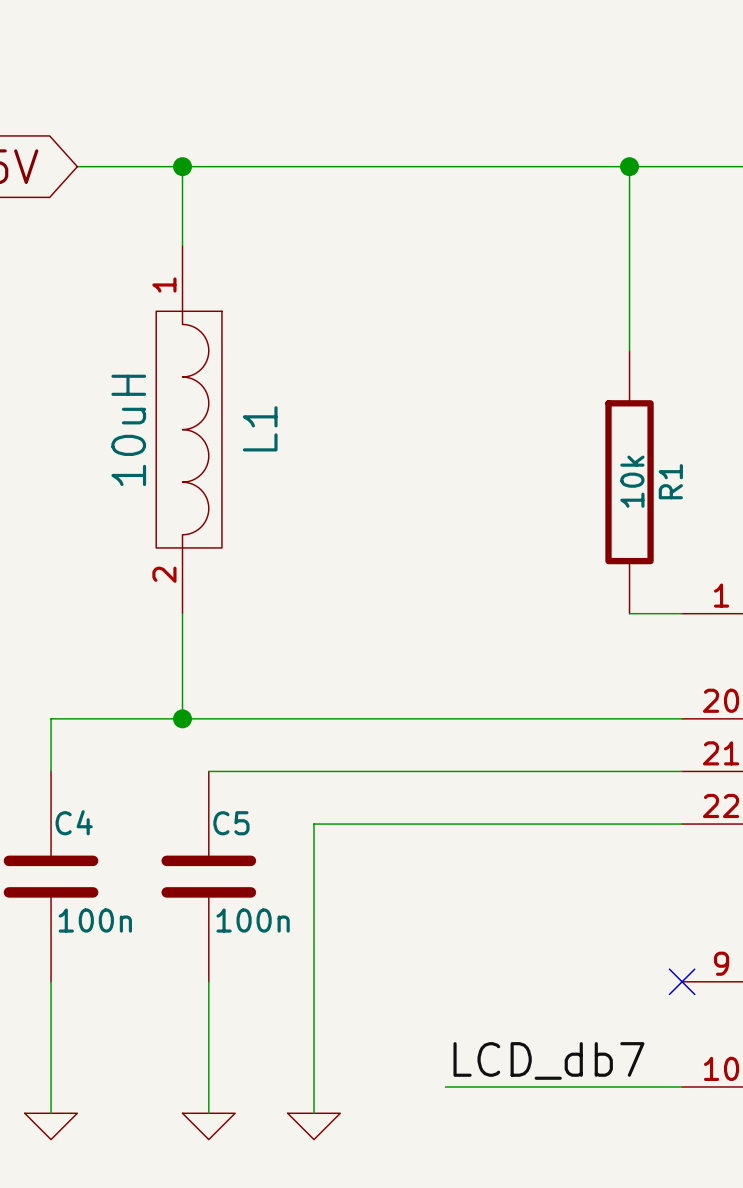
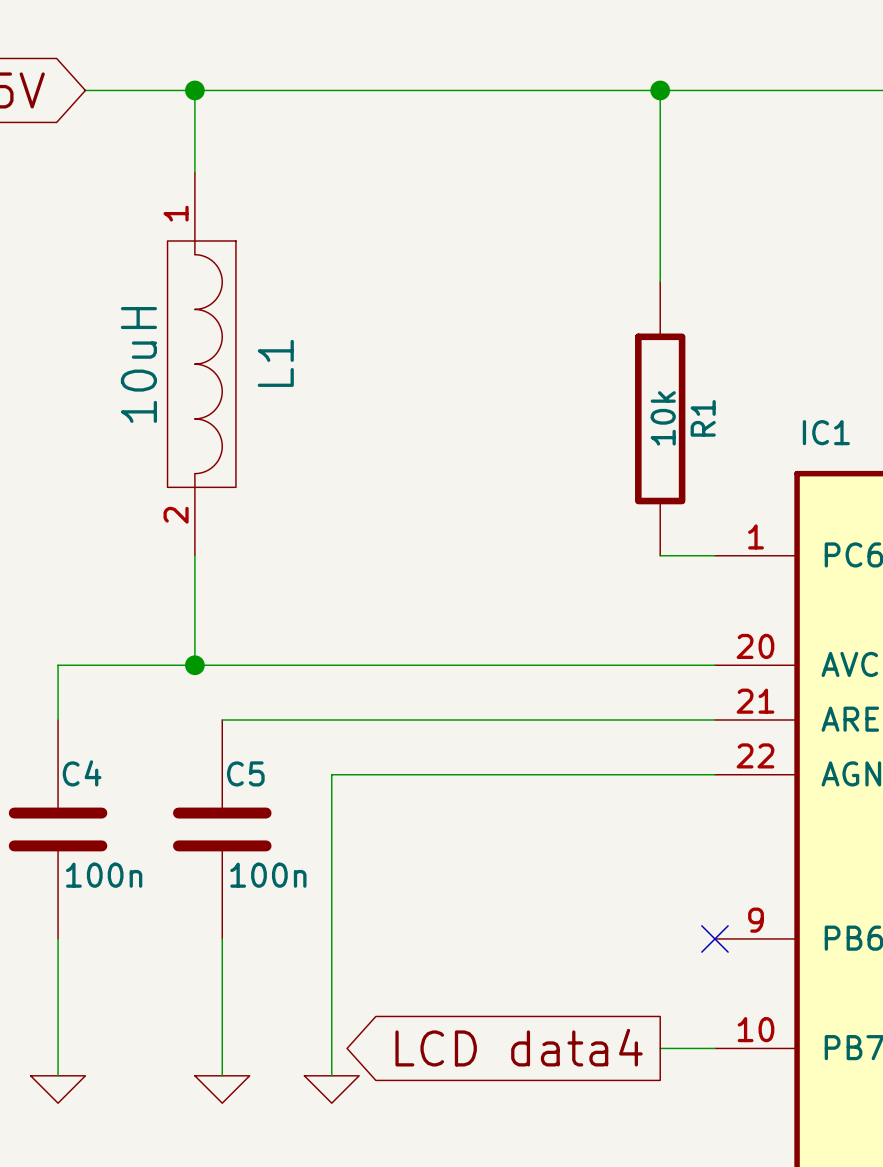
label: LCD_db7 (548, 1060) -> none
wire: (445, 1086) (629, 1086) -> none
global label: none -> LCD data4 (519, 1047)

